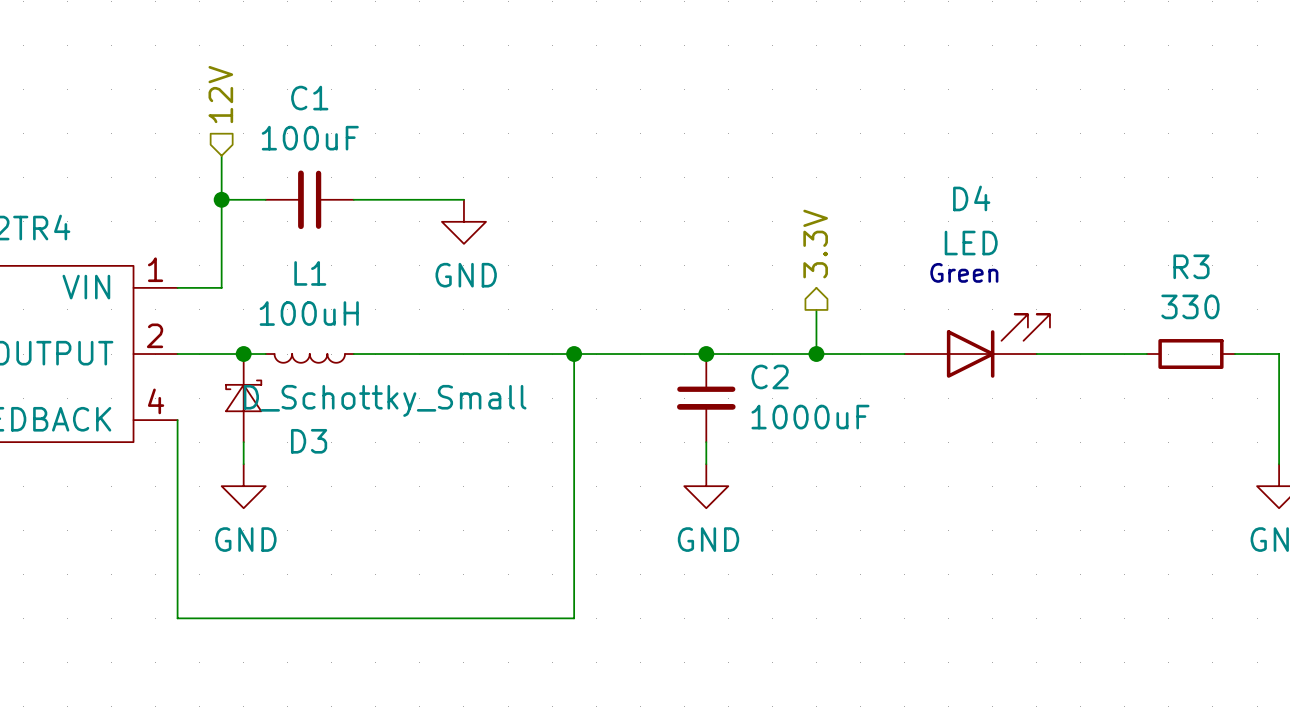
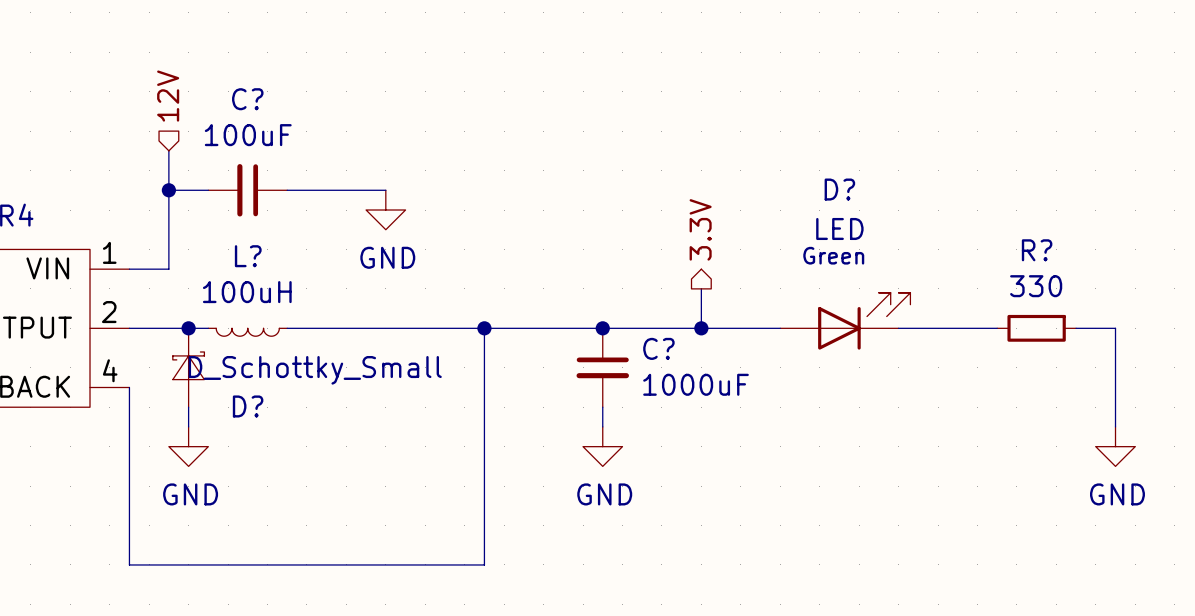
C1 name: C1 (309, 98) -> C? (247, 99)
D4 name: D4 (971, 198) -> D? (839, 189)
R3 name: R3 (1191, 266) -> R? (1037, 250)
L1 name: L1 (310, 273) -> L? (248, 256)
C2 name: C2 (770, 376) -> C? (658, 348)
D3 name: D3 (309, 441) -> D? (248, 406)

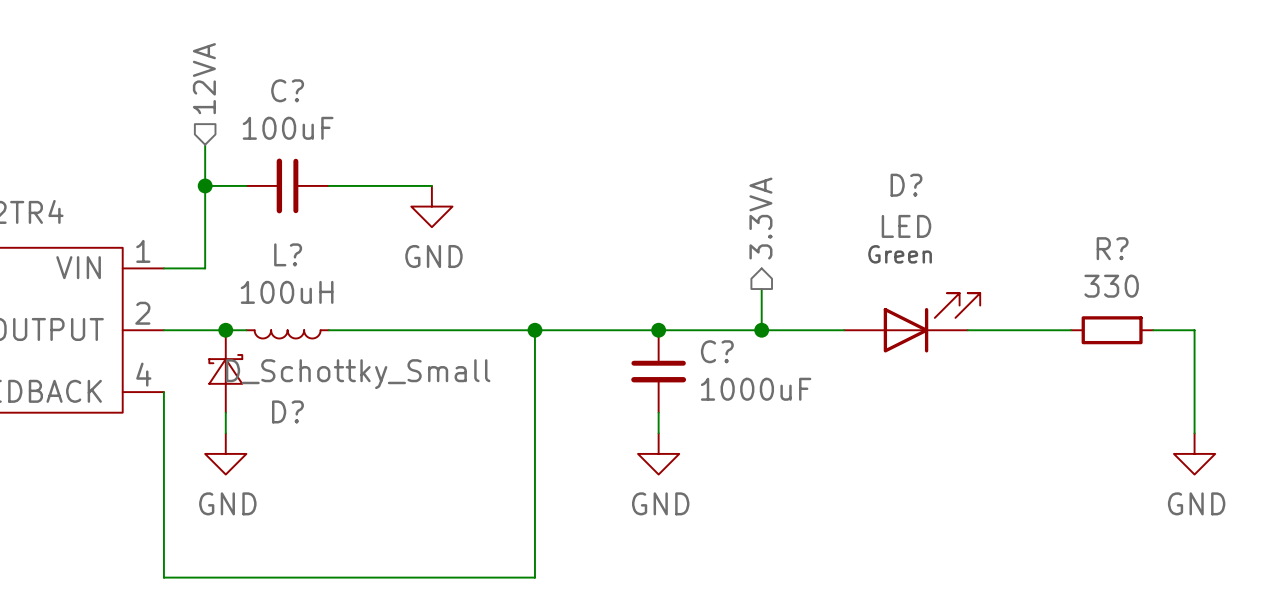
hierarchical label: 12V (168, 96) -> 12VA (204, 78)
hierarchical label: 3.3V (700, 229) -> 3.3VA (760, 218)

